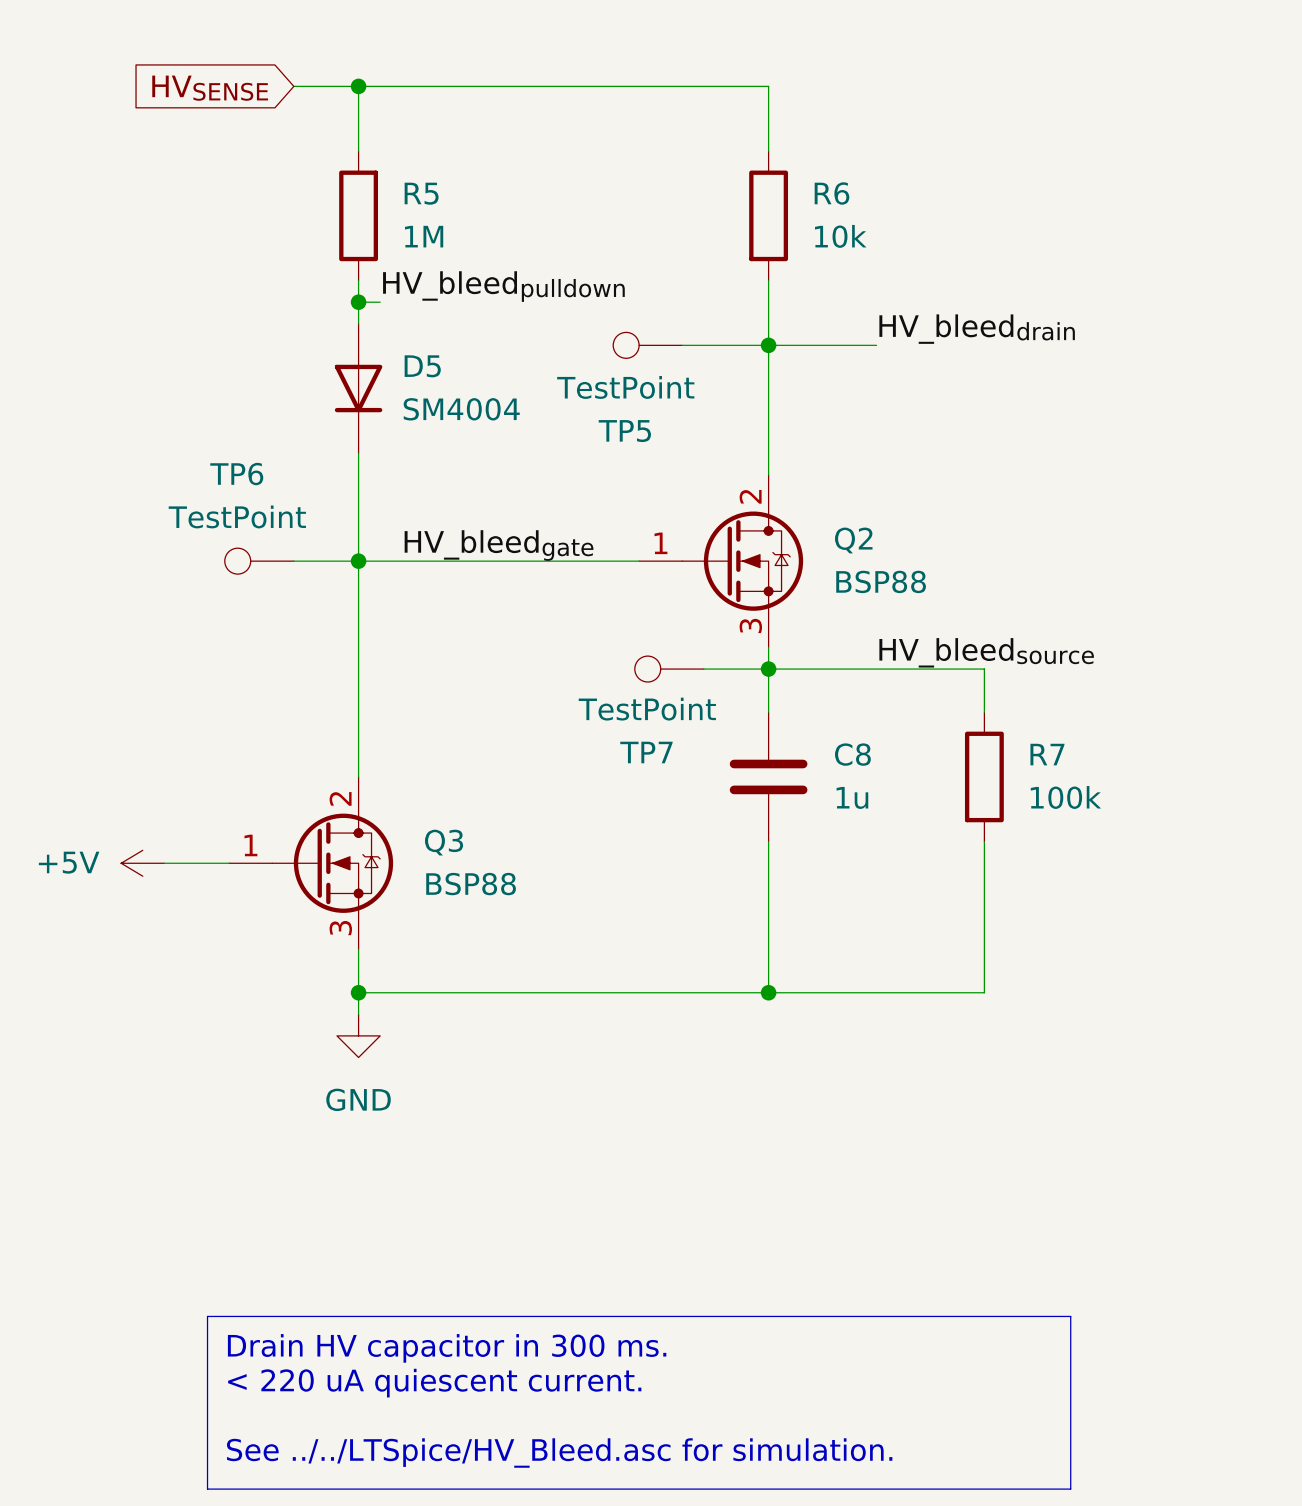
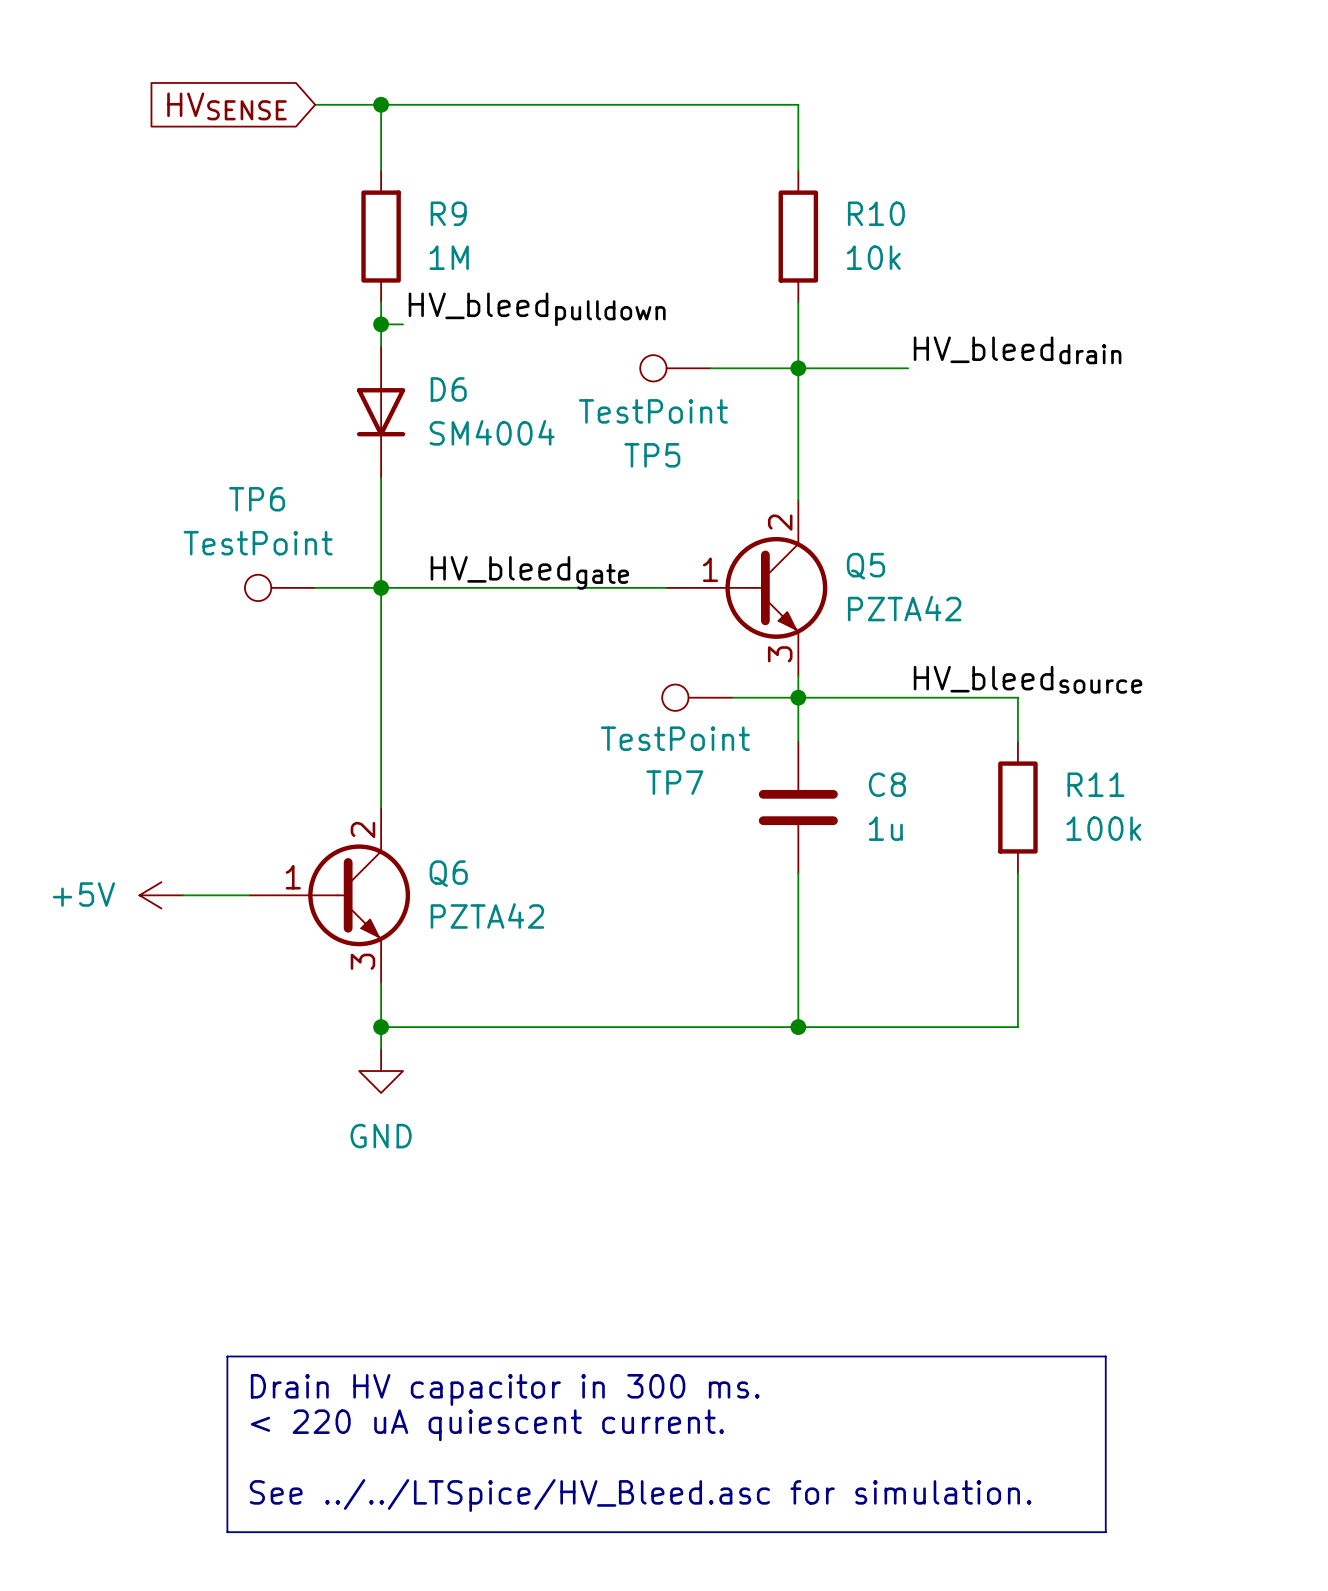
R5 name: R5 (421, 193) -> R9 (448, 213)
R6 name: R6 (831, 193) -> R10 (876, 213)
D5 name: D5 (422, 366) -> D6 (448, 389)
Q5: none -> PZTA42 (746, 587)
Q2: BSP88 (721, 561) -> none
R7 name: R7 (1047, 754) -> R11 (1096, 784)
Q6: none -> PZTA42 (329, 895)
Q3: BSP88 (311, 863) -> none

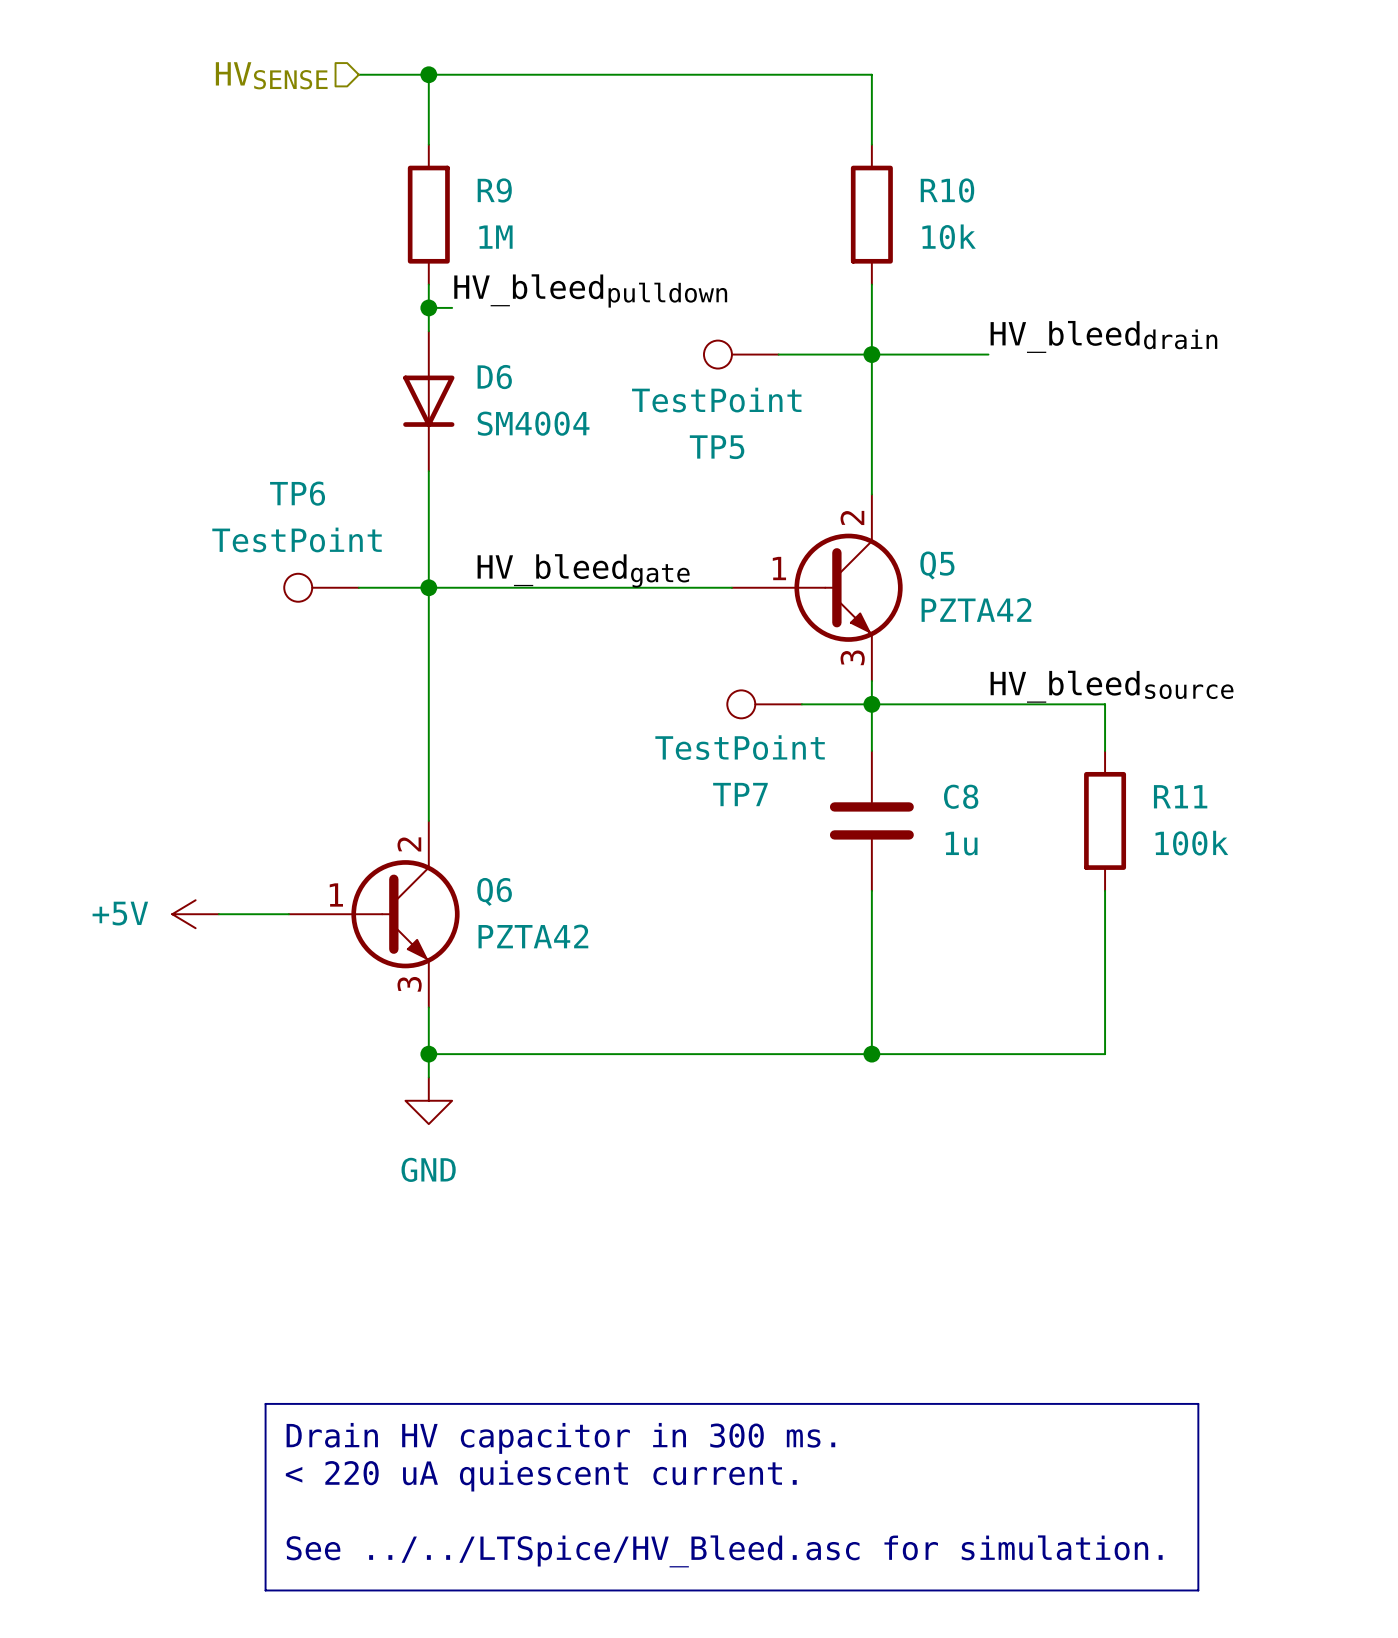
hierarchical label: none -> HVSENSE (271, 75)
global label: HVSENSE (226, 106) -> none

